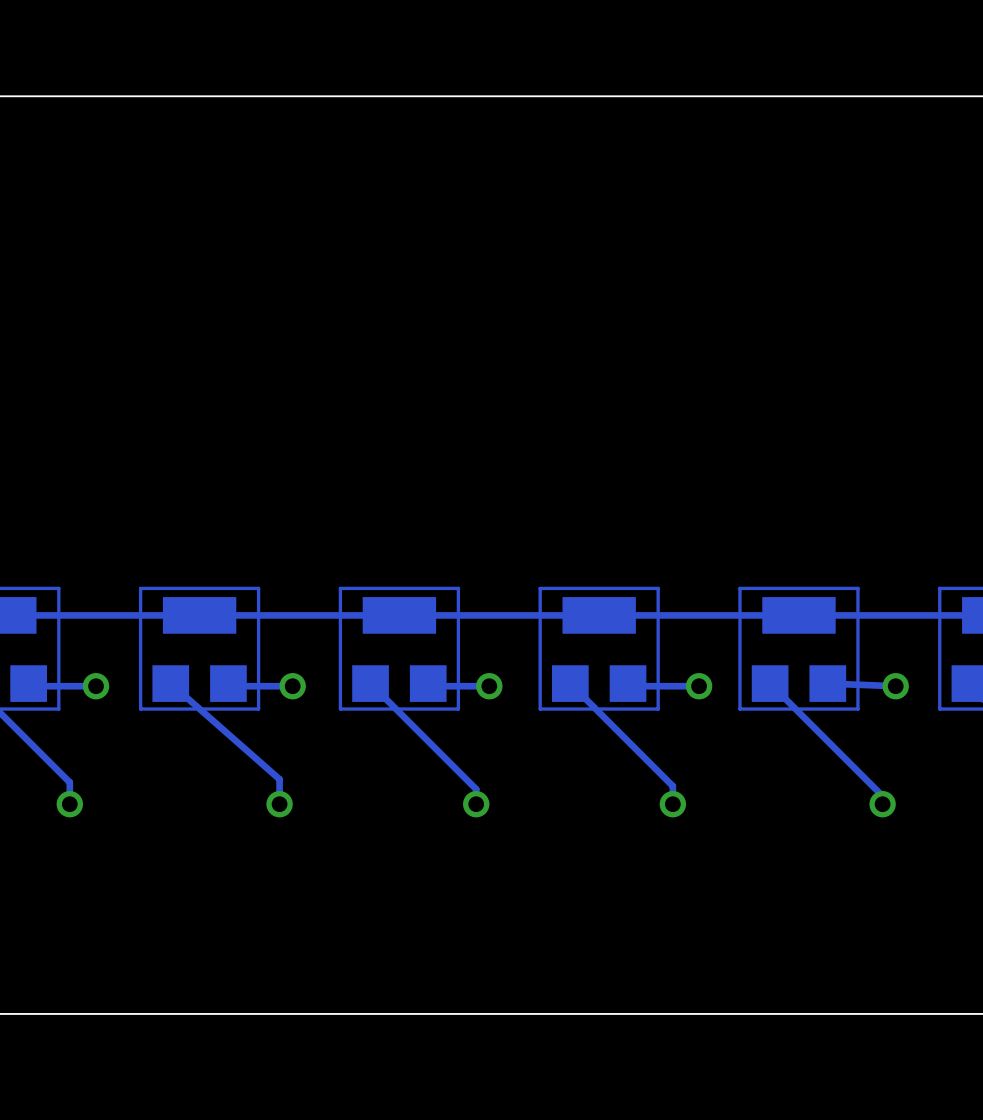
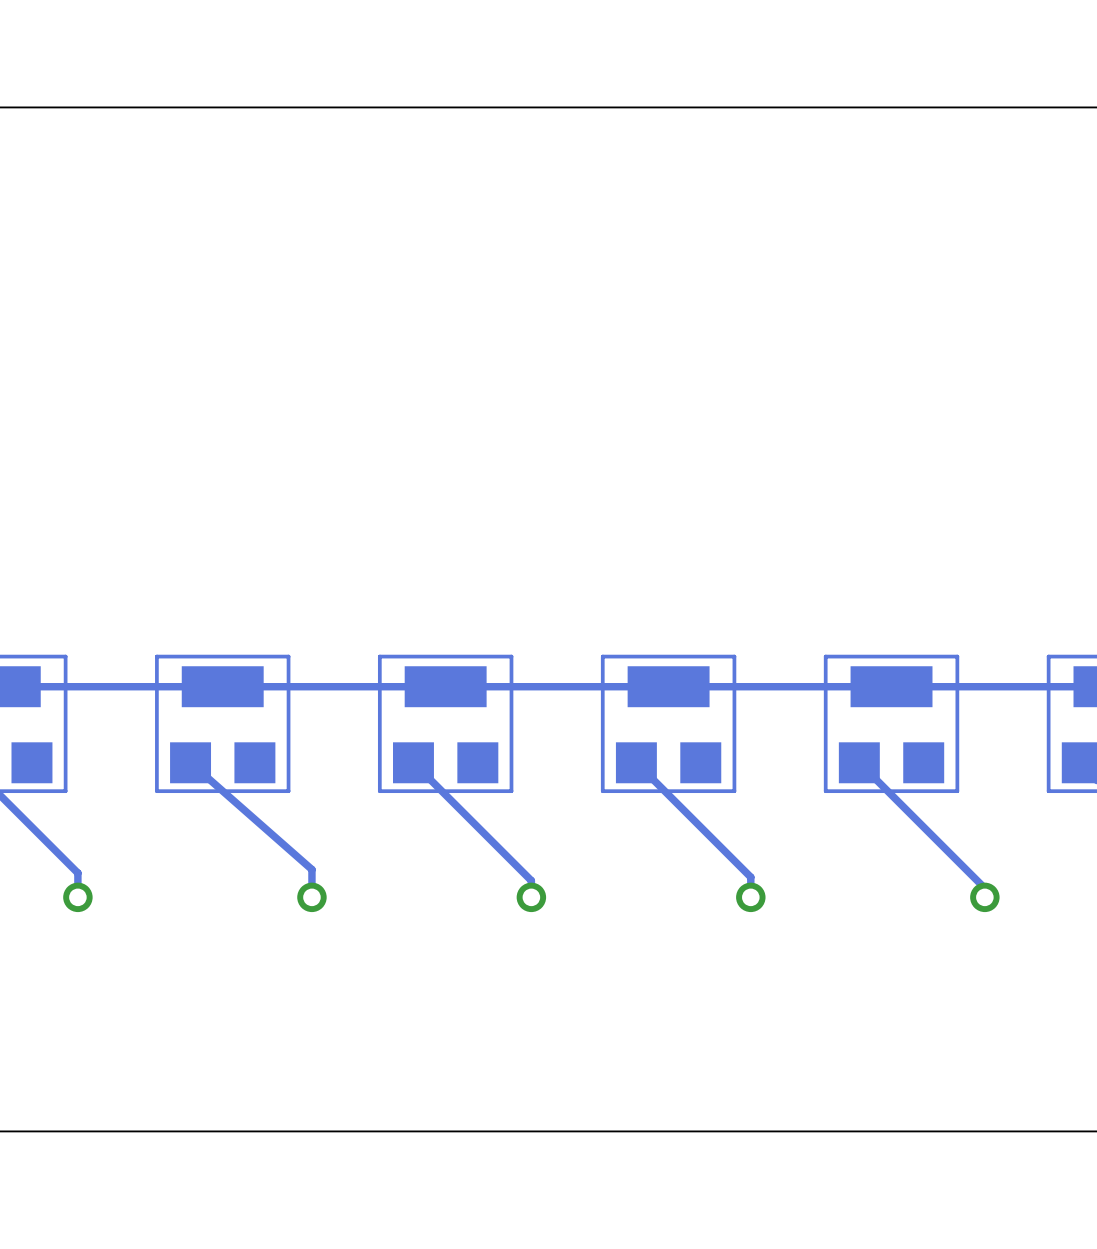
track: (28, 683) (31, 686) (96, 686) -> none
track: (228, 683) (231, 686) (292, 686) -> none
track: (428, 683) (430, 686) (489, 686) -> none
track: (628, 683) (630, 686) (699, 686) -> none
track: (827, 683) (895, 686) -> none
via: (96, 686) -> none
via: (292, 686) -> none
via: (489, 686) -> none
via: (699, 686) -> none
via: (895, 686) -> none

